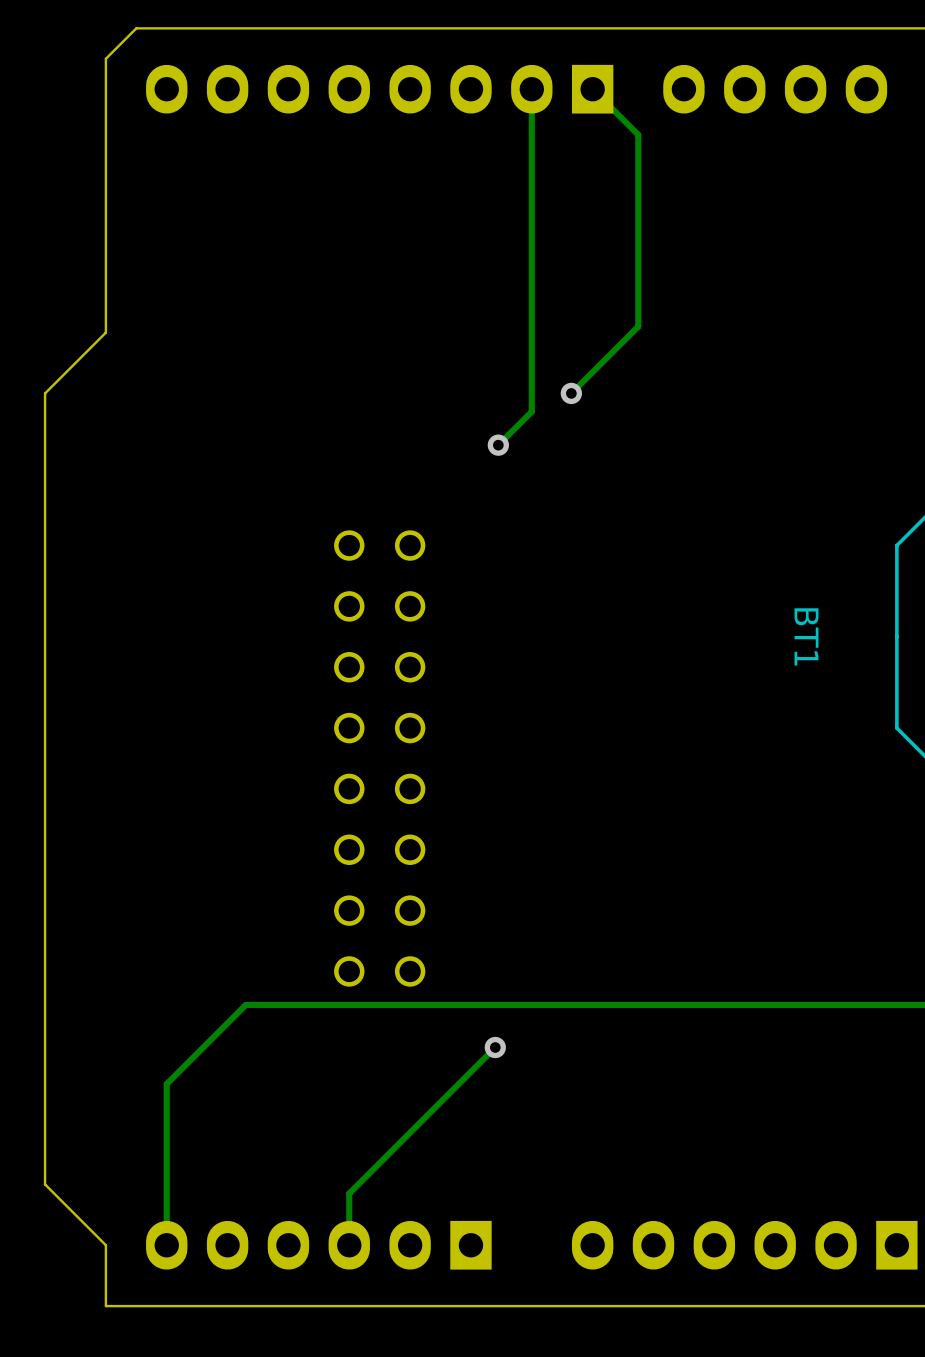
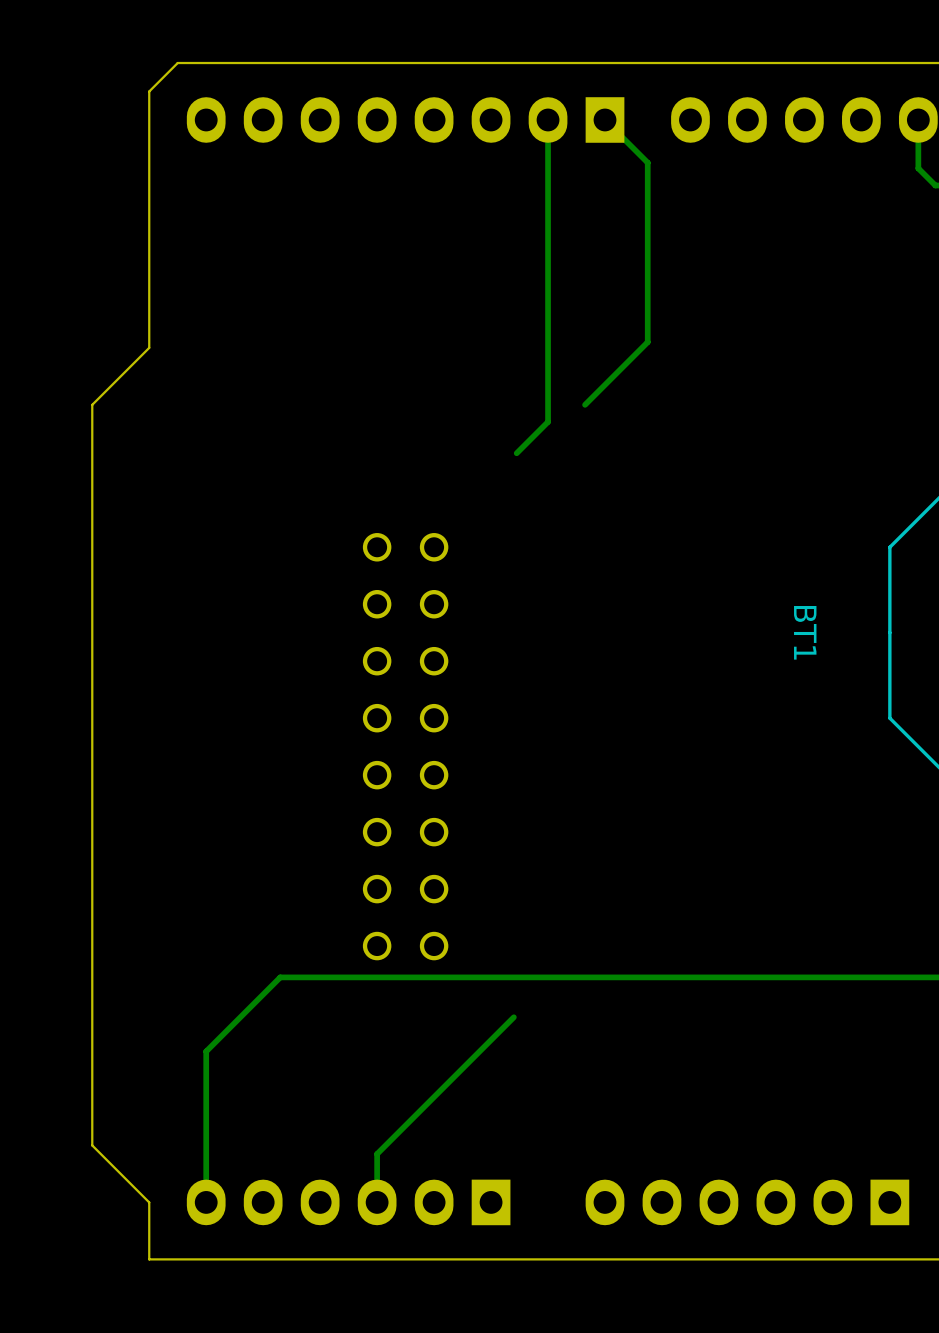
via: (571, 393) -> none
via: (498, 445) -> none
via: (495, 1047) -> none

